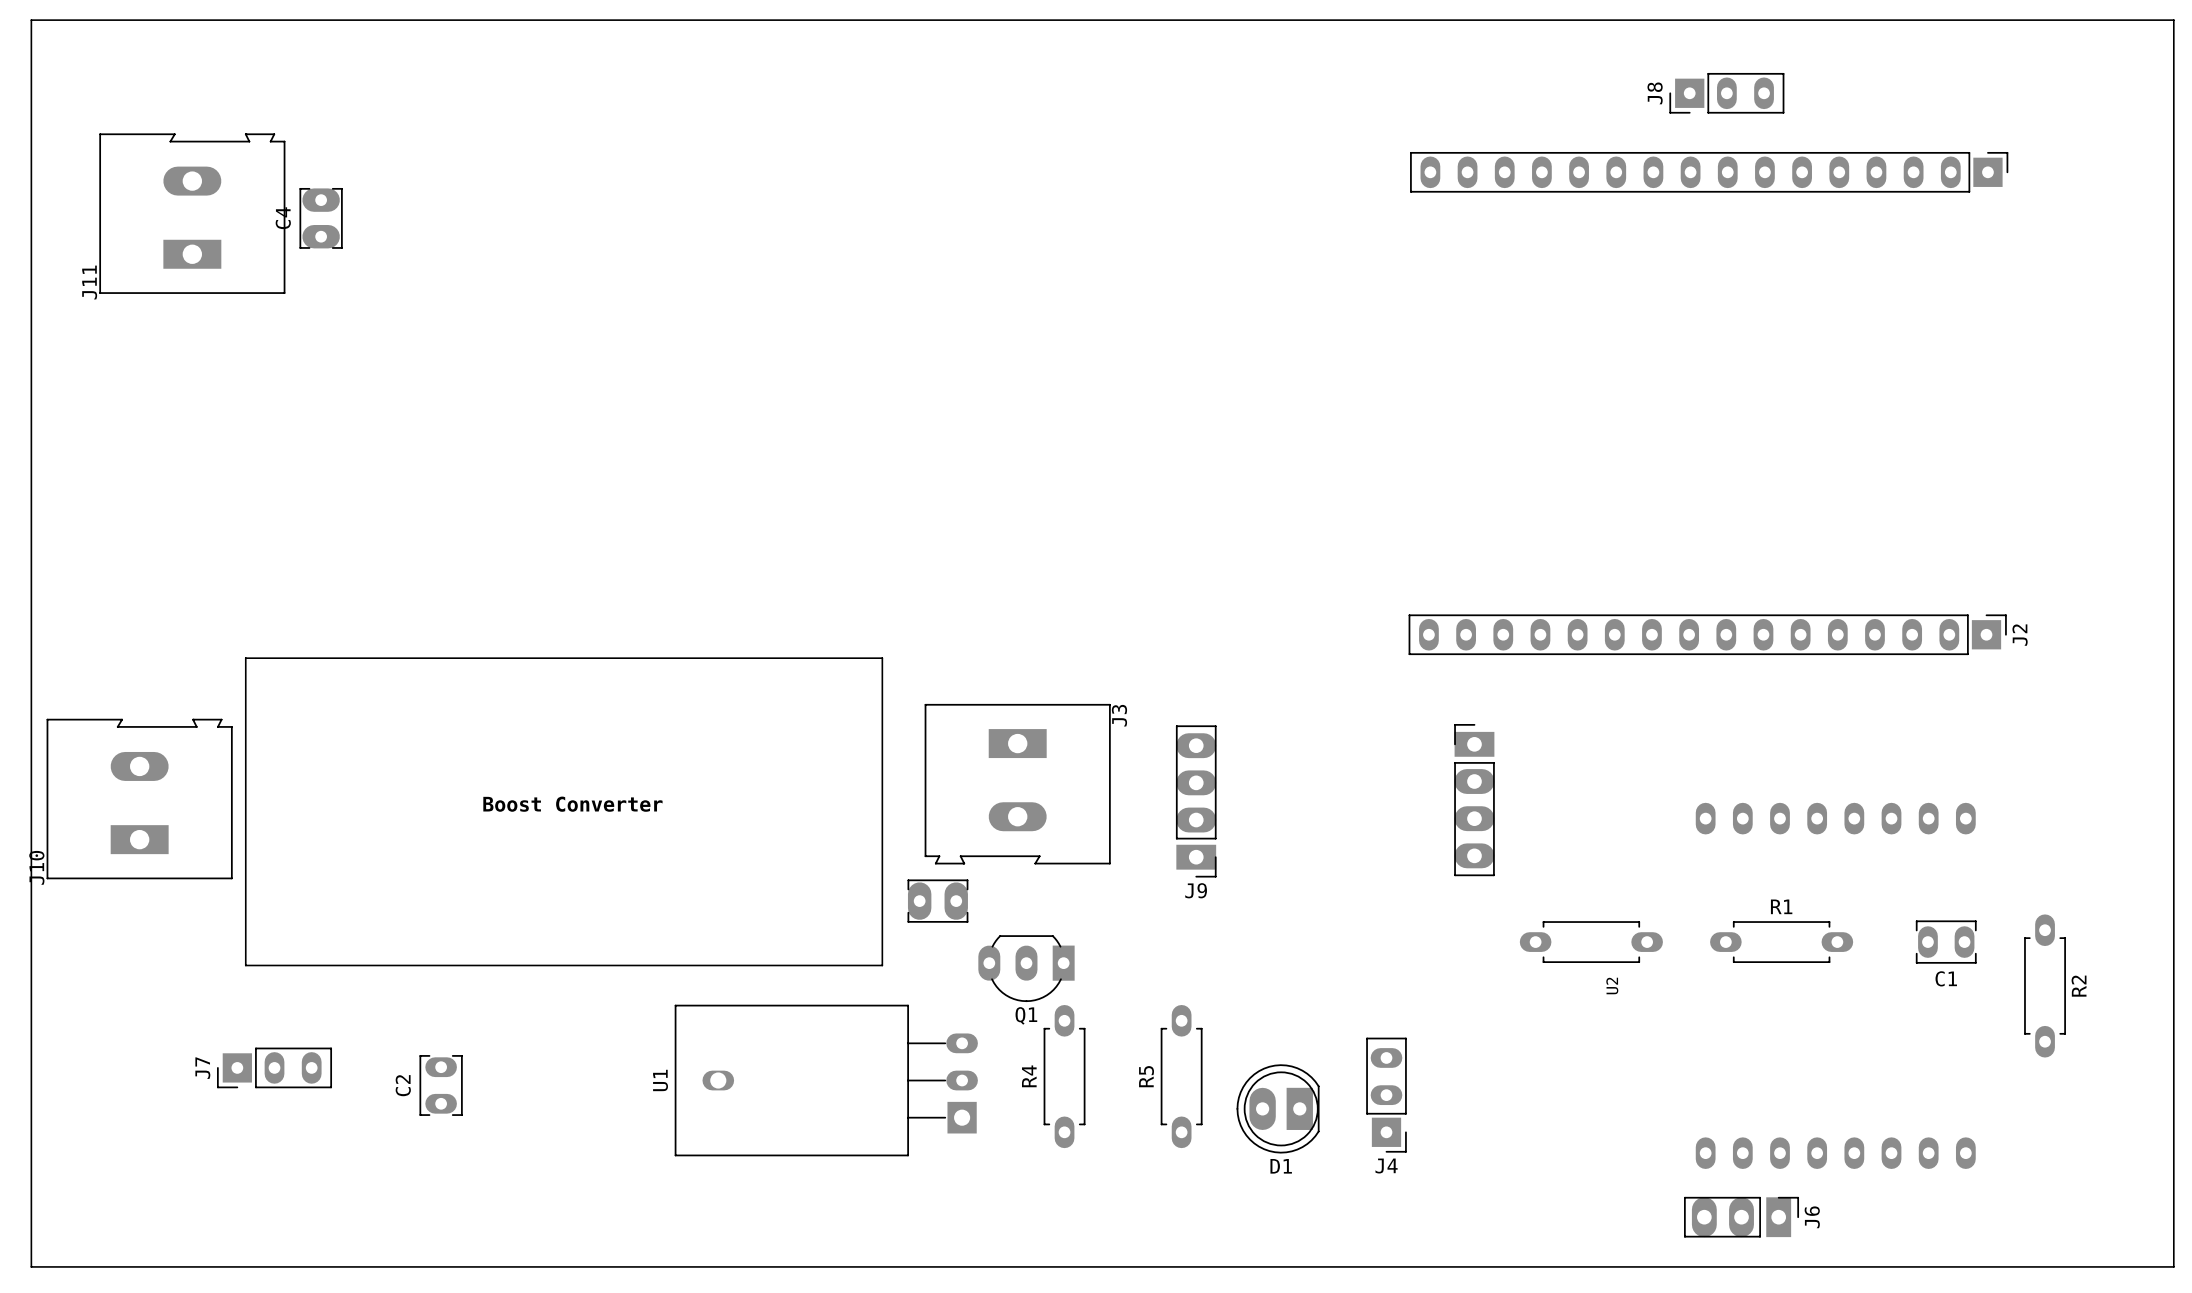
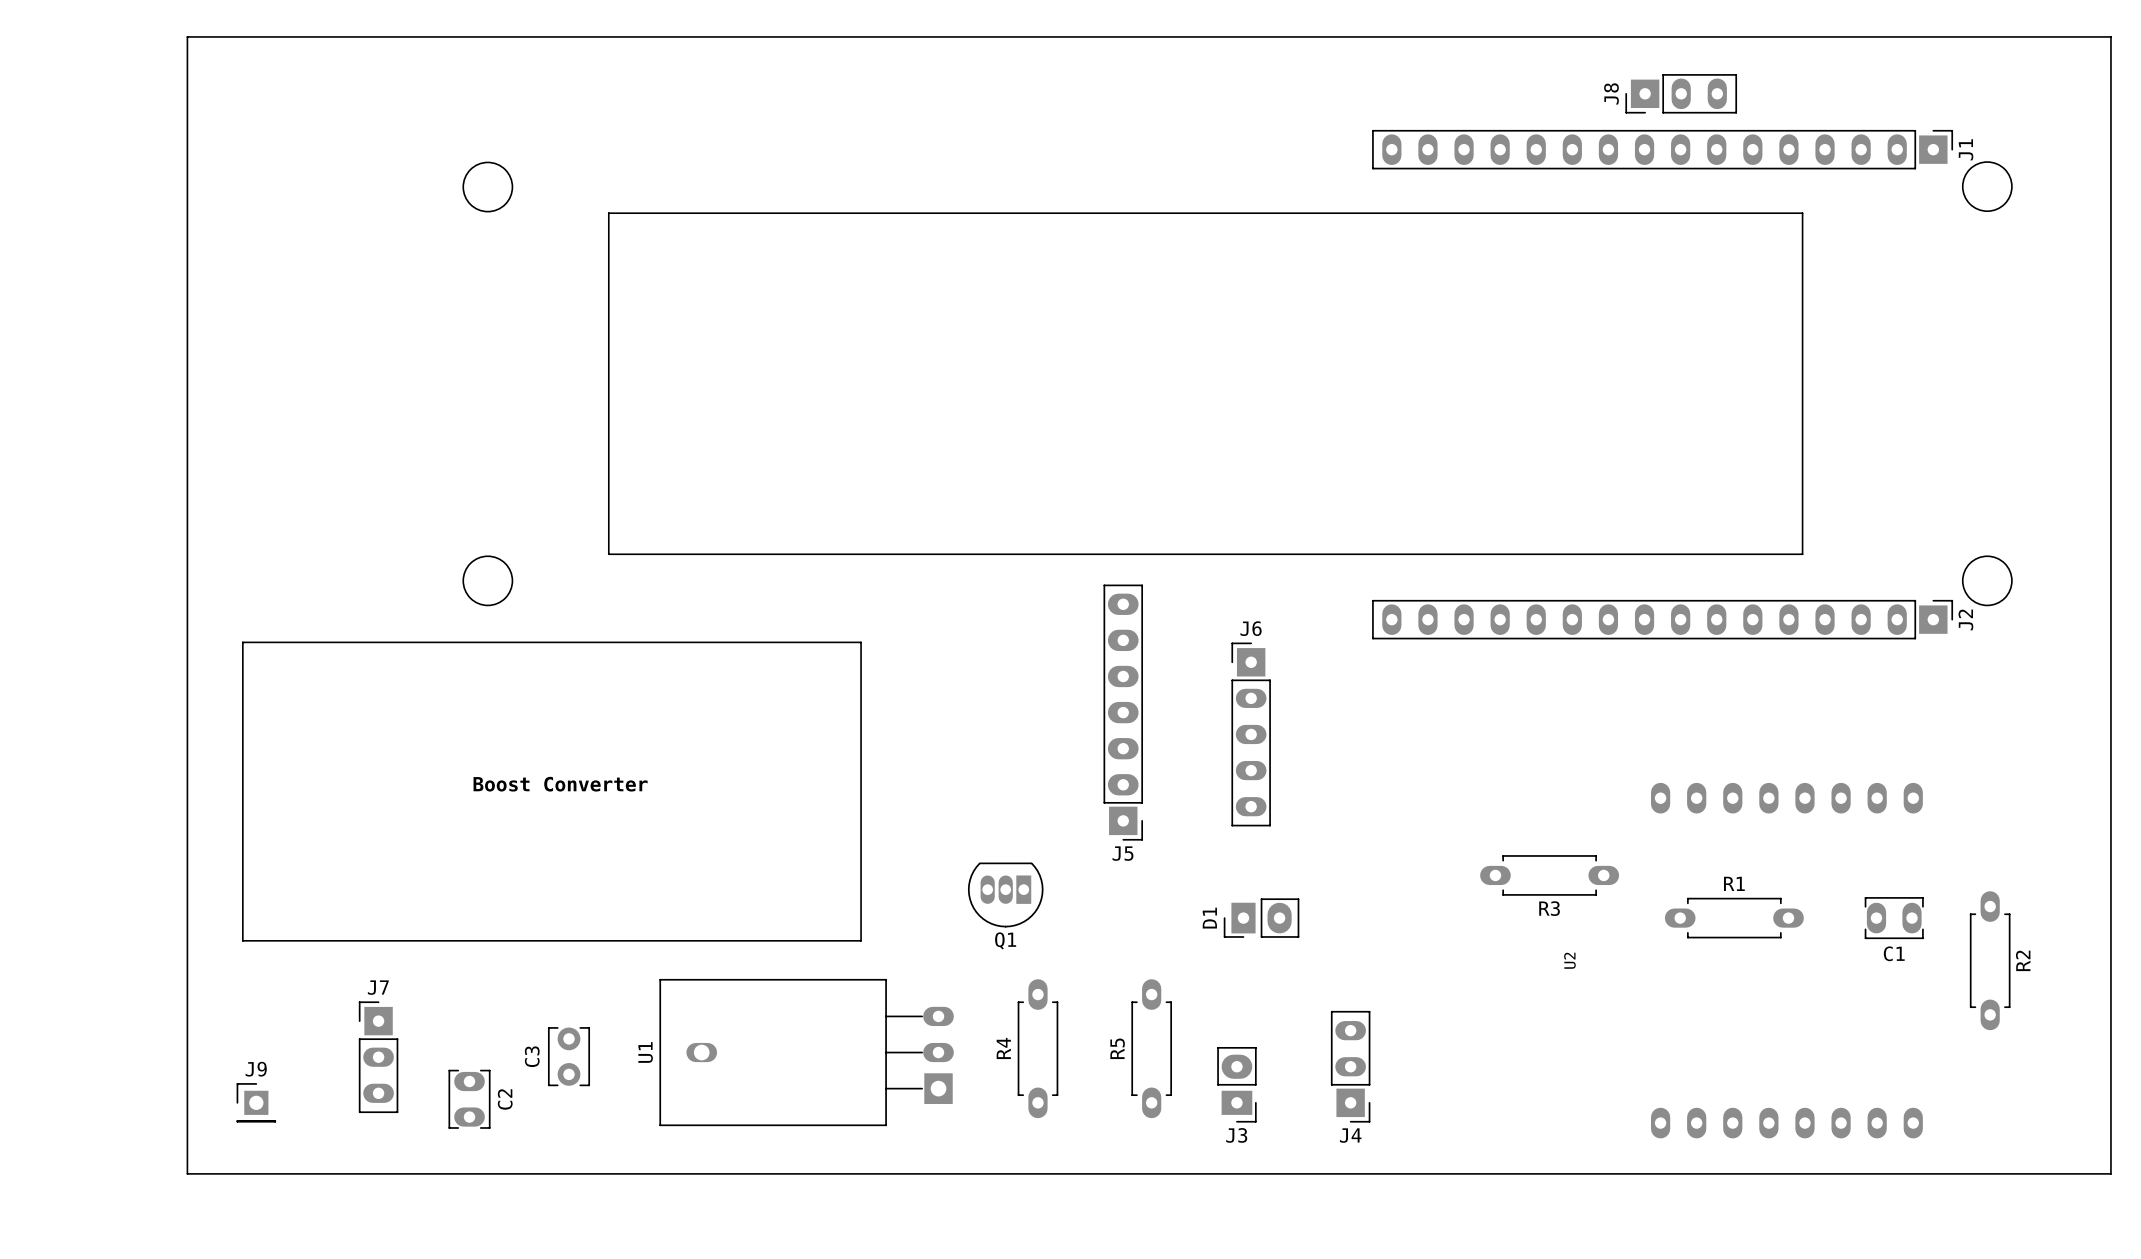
board edge: (31, 20) (2173, 20) (2173, 1266) (31, 1266) (31, 20) -> (187, 36) (187, 1173) (2110, 1173) (2110, 36) (187, 36)
J1: none -> (1662, 149)
round board edge: none -> [462, 162, 513, 212]
round board edge: none -> [1962, 161, 2013, 212]
part: (1709, 172) -> none
J11: (192, 213) -> none
board edge: none -> (608, 213) (1802, 213) (1802, 554) (608, 554) (608, 213)
C4: (321, 218) -> none
round board edge: none -> [462, 555, 513, 606]
round board edge: none -> [1962, 555, 2013, 606]
J3 footprint: [924, 703, 1111, 865] -> [1217, 1046, 1257, 1123]
J3 name position: J3 (1119, 715) -> J3 (1236, 1135)
J9 footprint: [1175, 725, 1217, 878] -> [236, 1083, 277, 1123]
J5: none -> (1123, 712)
J10: (139, 799) -> none
part: (1474, 800) -> none
J9 name position: J9 (1196, 890) -> J9 (256, 1069)
R3: none -> (1549, 875)
part: (937, 901) -> none
Q1 footprint: [978, 935, 1075, 1003] -> [967, 862, 1044, 928]
part: (1591, 942) -> none
D1 footprint: [1236, 1064, 1320, 1154] -> [1223, 898, 1300, 938]
J7 rotation: 0° (274, 1067) -> 90° clockwise (378, 1057)
J7 position: (274, 1067) -> (378, 1057)
C3: none -> (569, 1056)
C2 name position: C2 (403, 1085) -> C2 (505, 1099)
C2 position: (441, 1085) -> (469, 1099)
D1 name position: D1 (1281, 1166) -> D1 (1209, 918)
J6 footprint: [1684, 1196, 1800, 1238] -> [1231, 642, 1271, 827]
J6 name position: J6 (1812, 1217) -> J6 (1251, 628)

